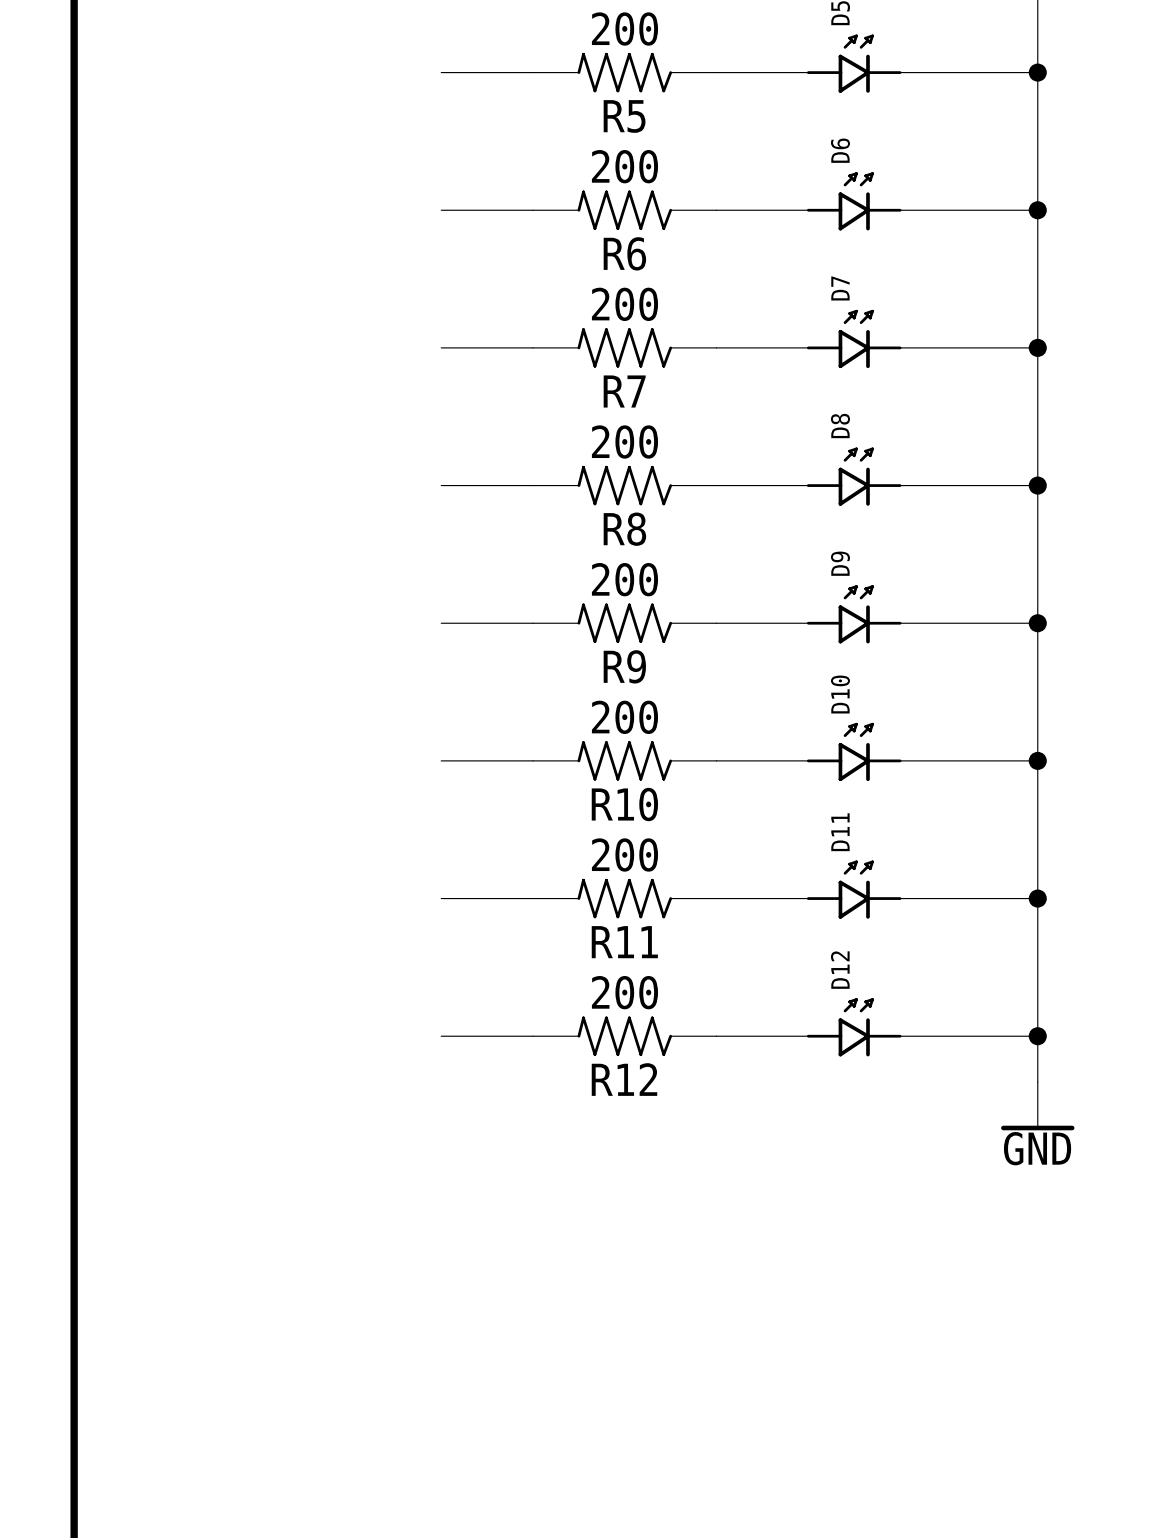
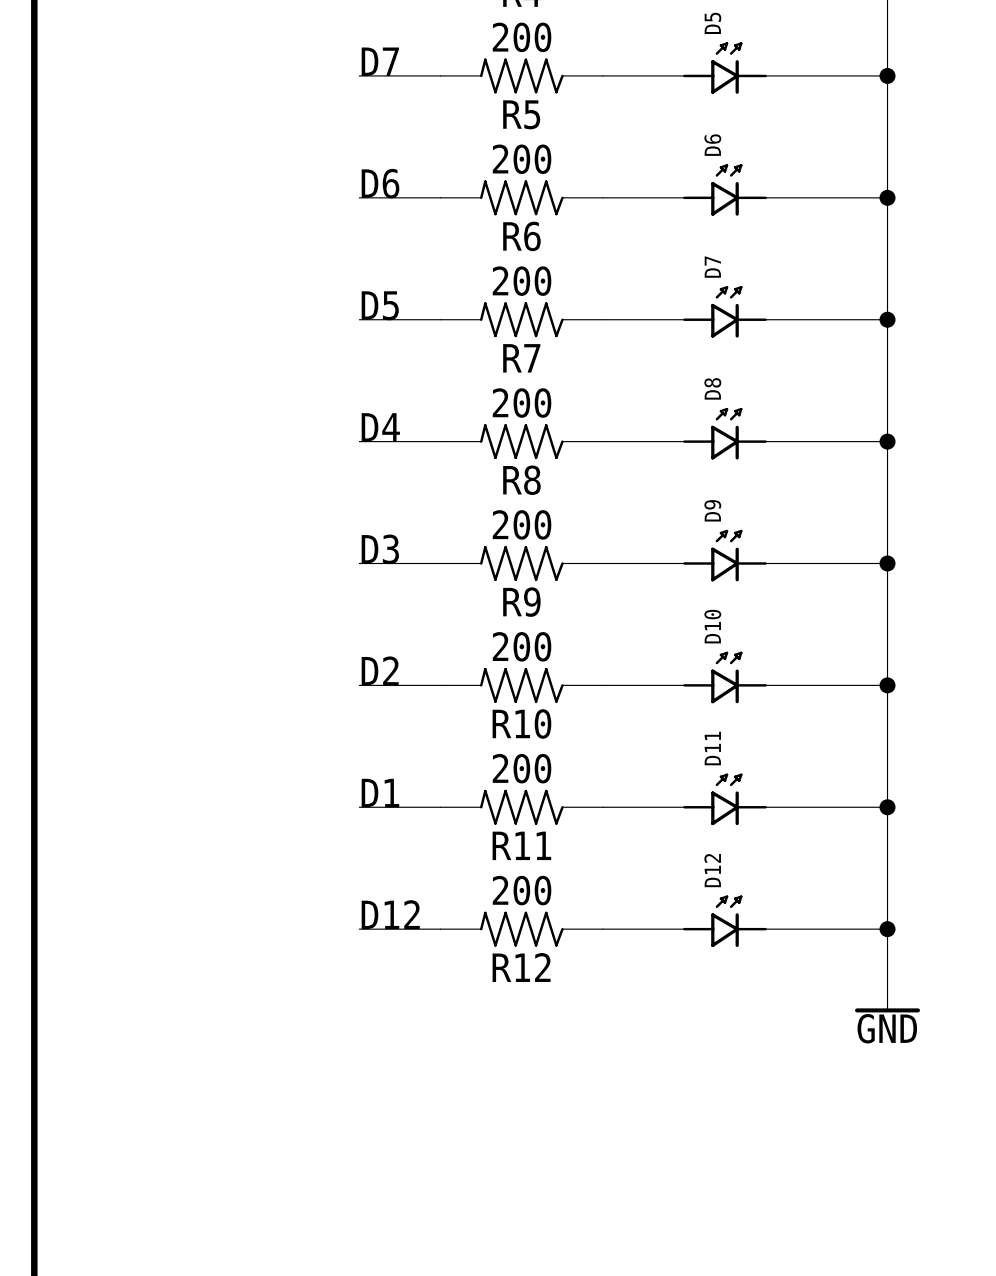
label: none -> D7 (380, 61)
label: none -> D6 (380, 183)
label: none -> D5 (380, 305)
label: none -> D4 (380, 427)
label: none -> D3 (380, 549)
label: none -> D2 (380, 670)
label: none -> D1 (380, 793)
label: none -> D12 (390, 914)

